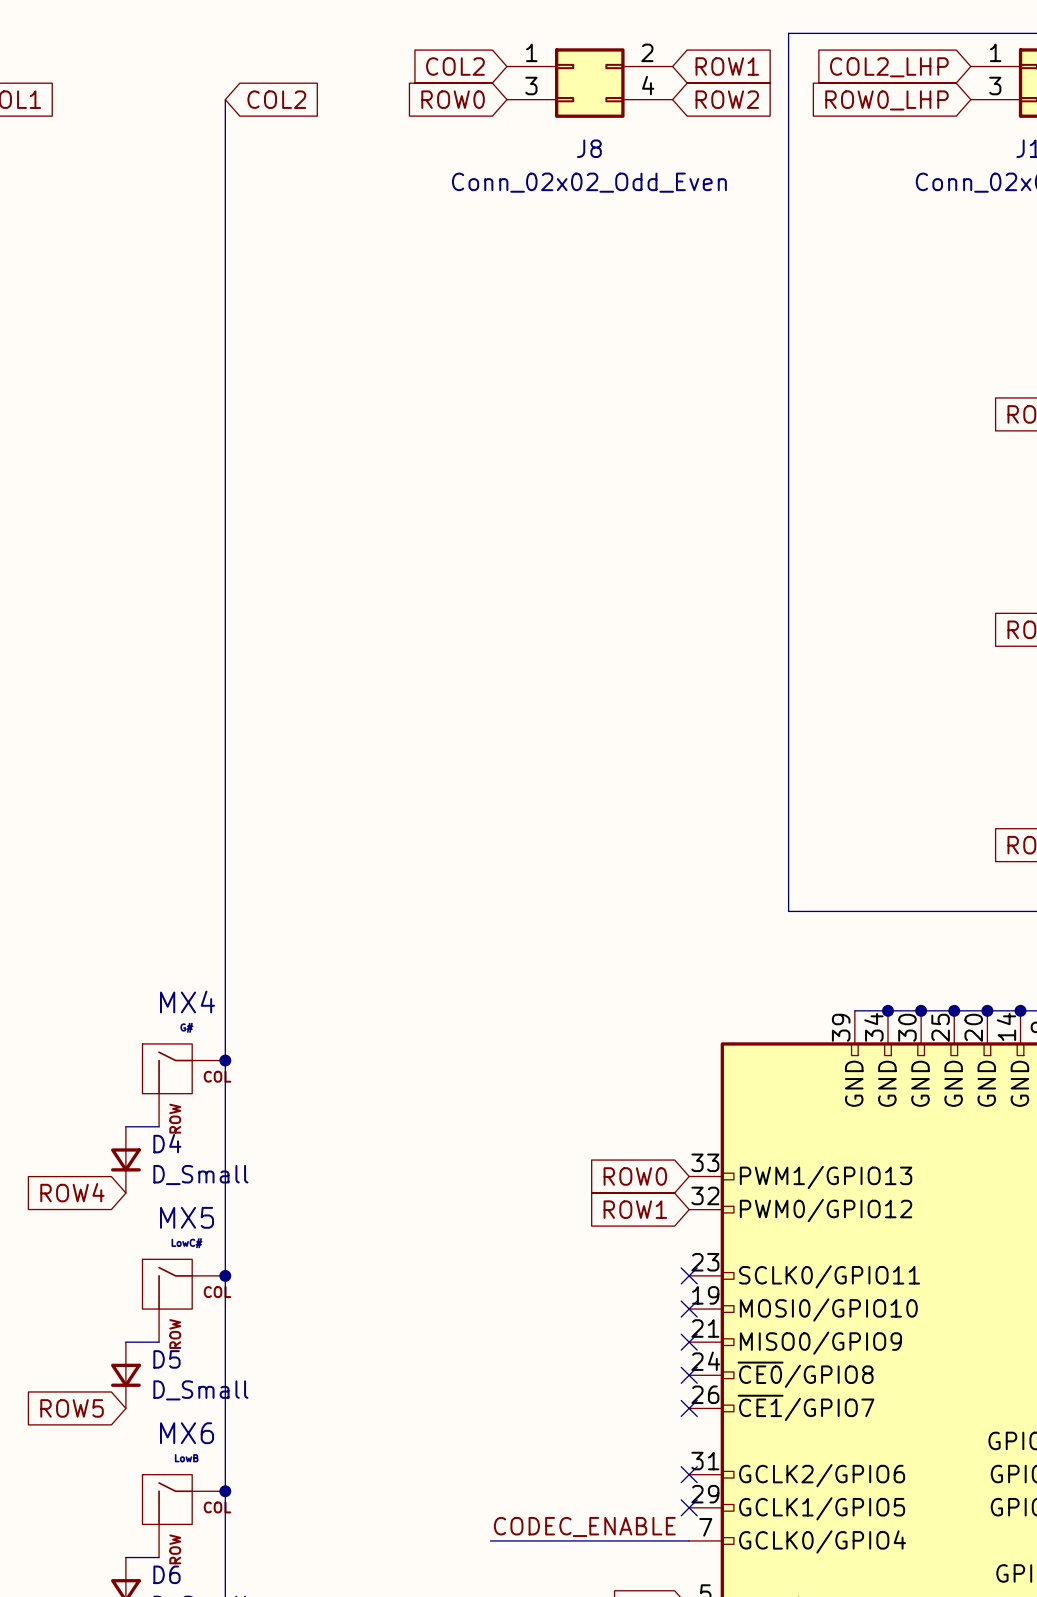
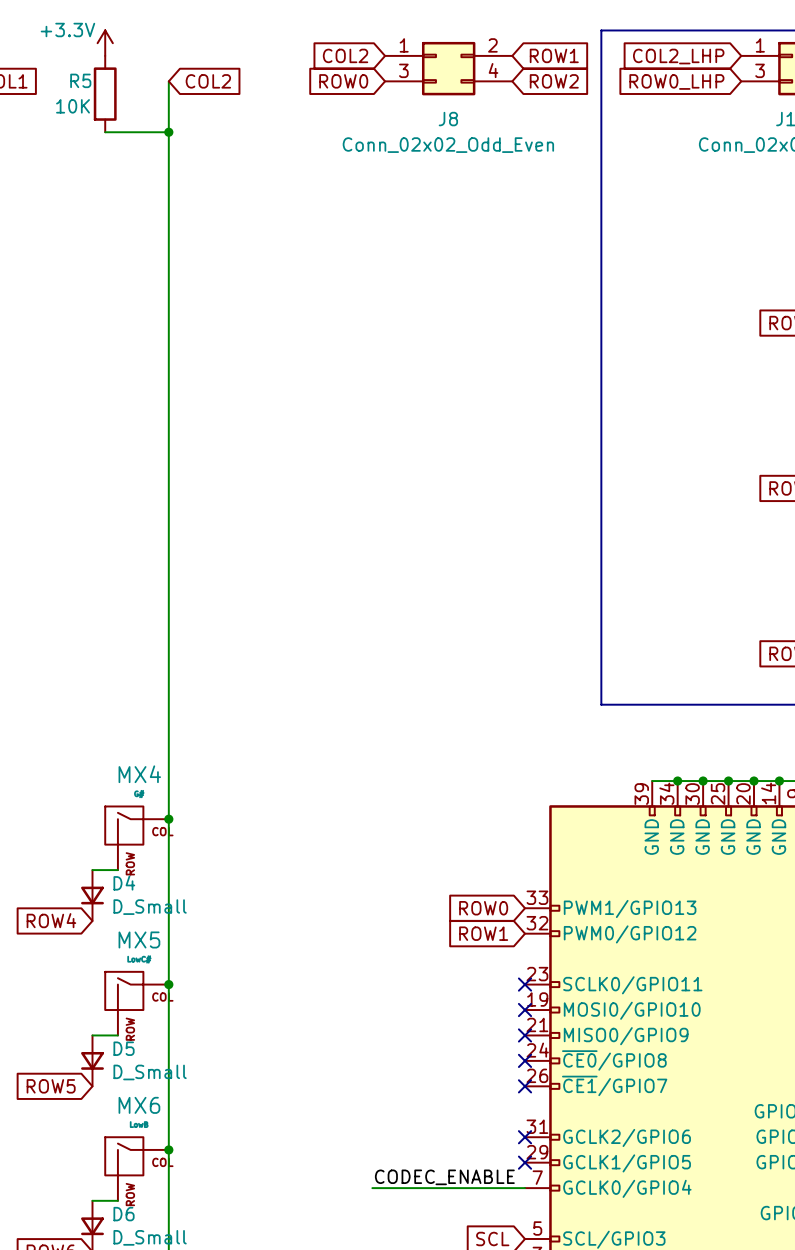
power symbol: none -> +3.3V (105, 43)
R5: none -> 10K (105, 94)
wire: none -> (105, 132) (168, 132)
junction: none -> (168, 132)

